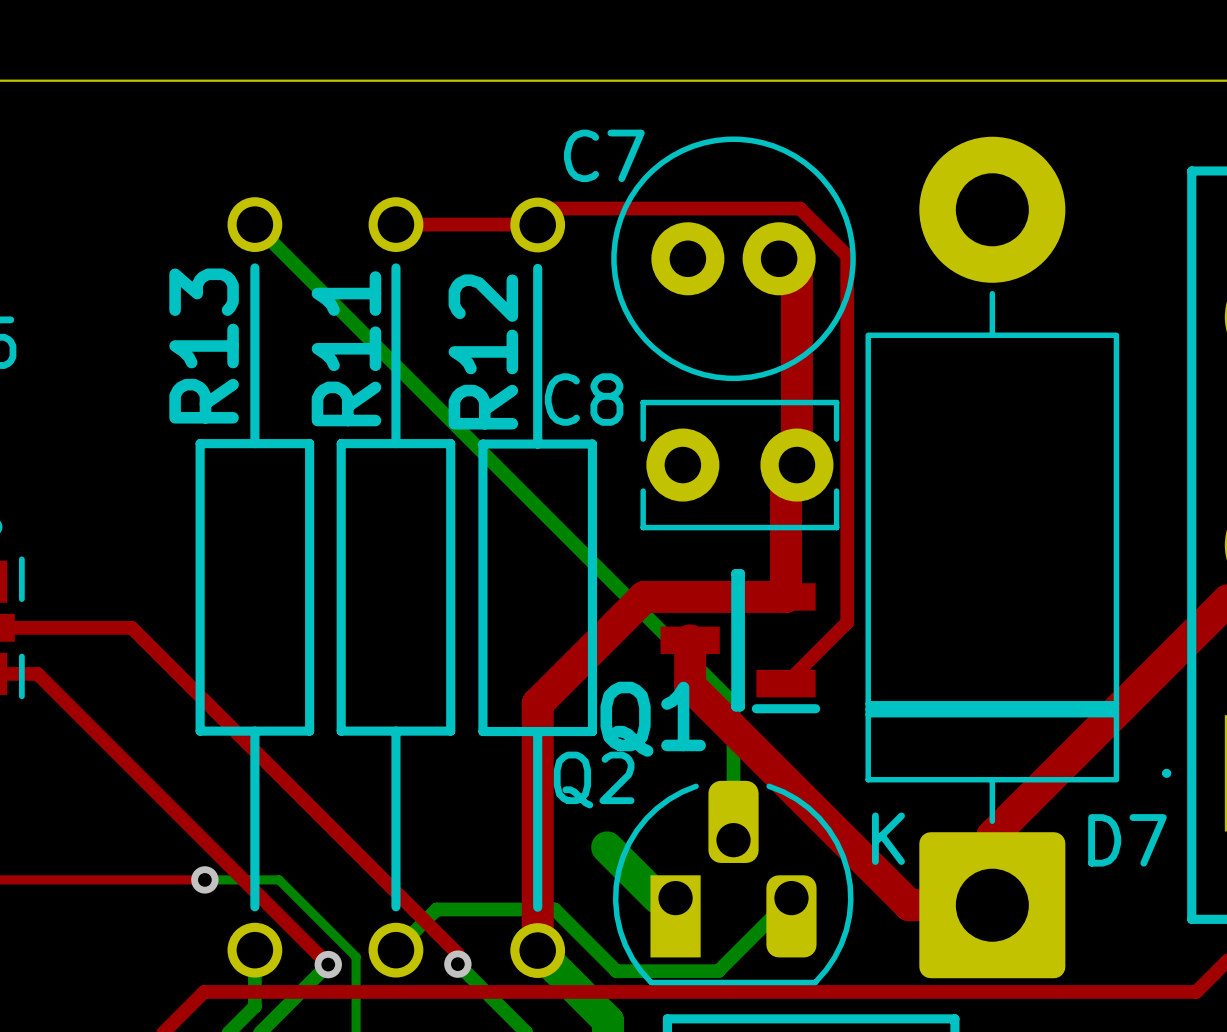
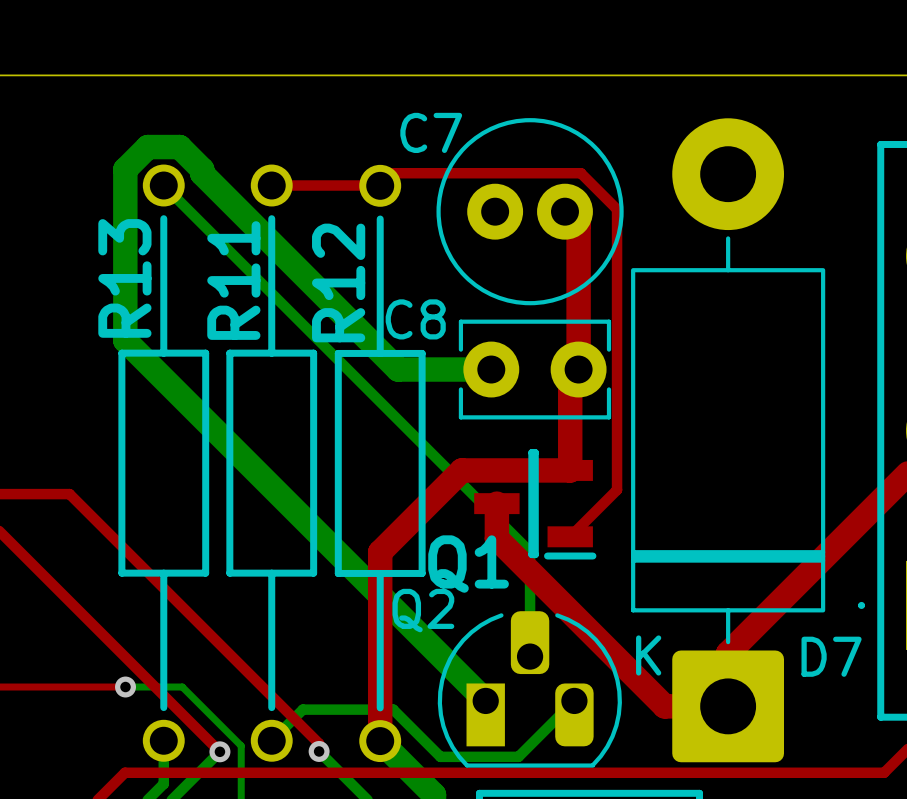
bottom track: none -> (491, 369) (398, 369) (202, 173) (202, 169) (179, 147) (147, 147) (125, 169) (125, 340) (485, 700)
bottom track: (607, 847) (657, 898) -> none

